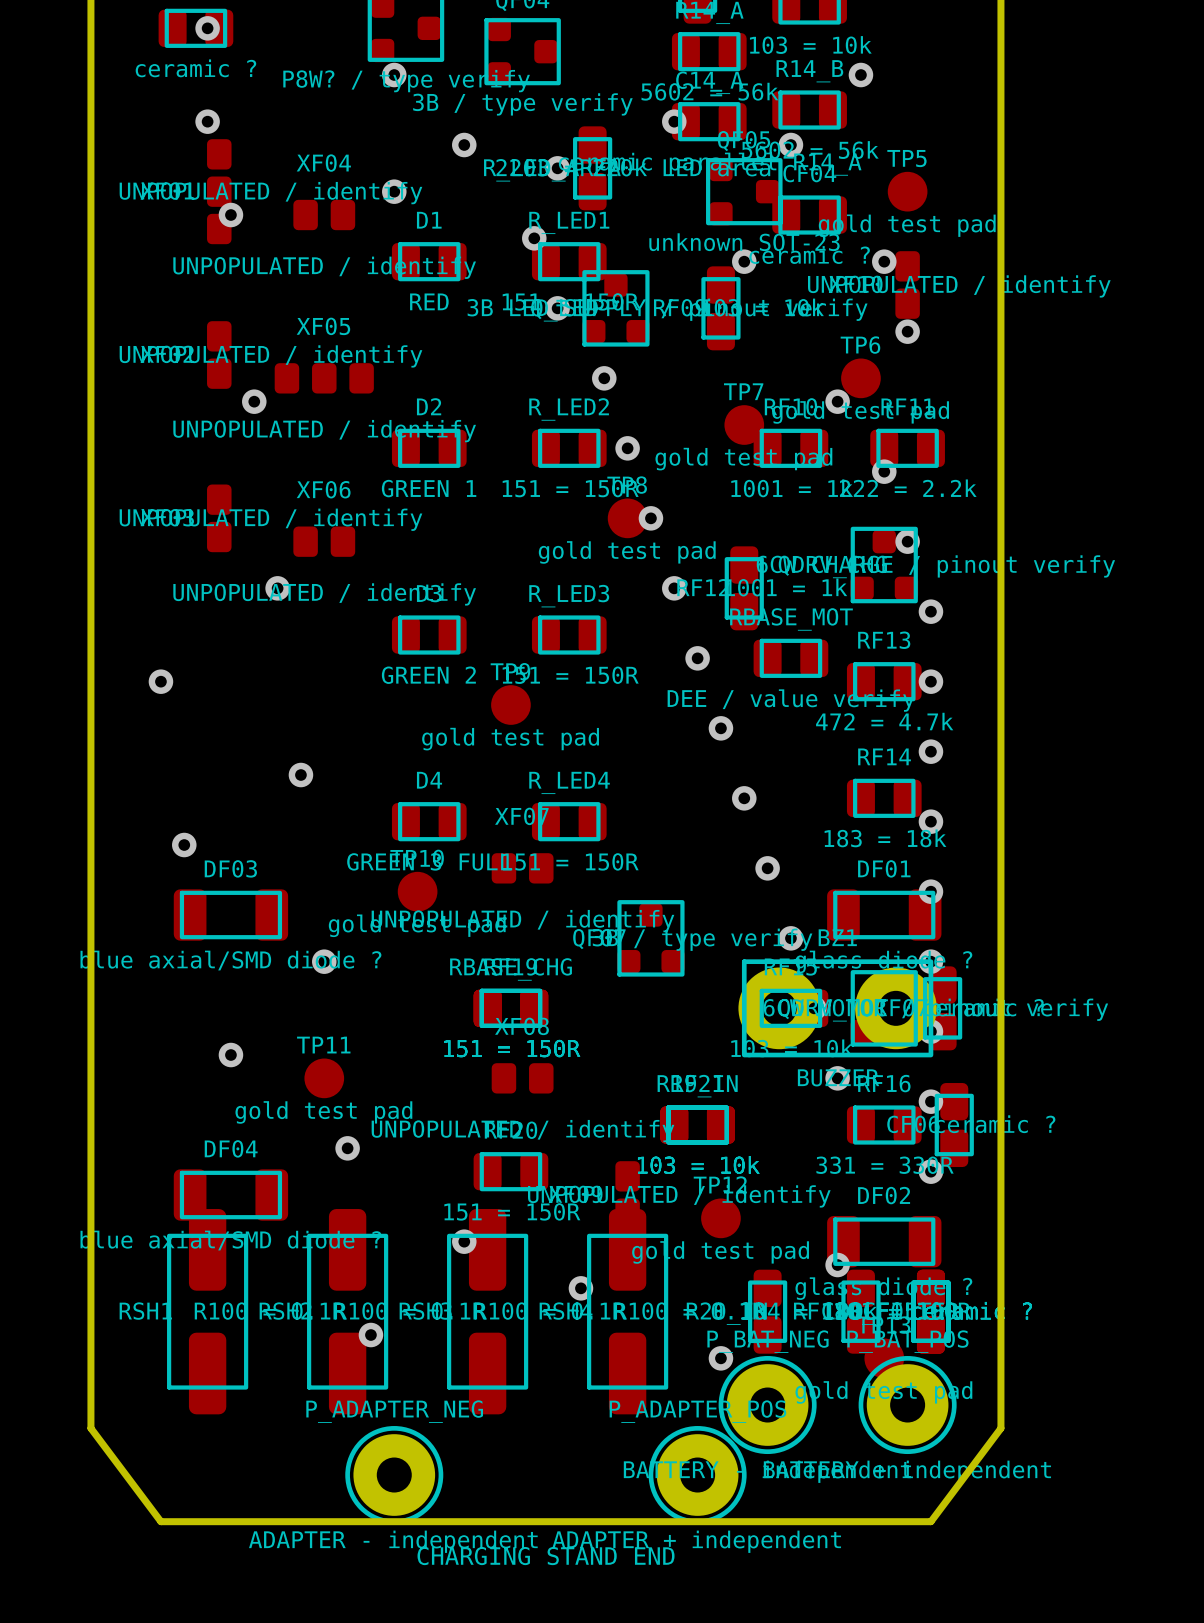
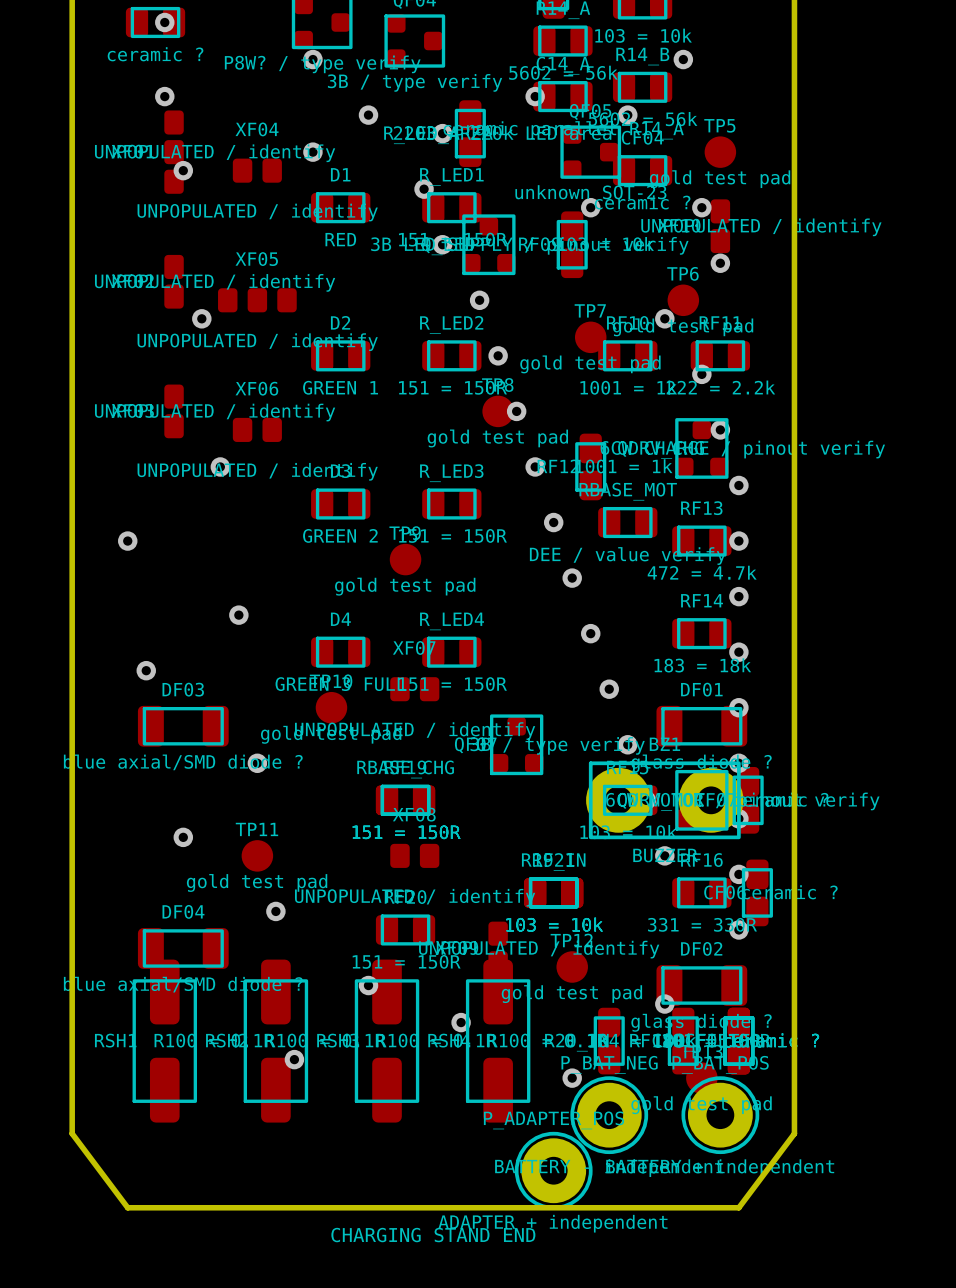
P_ADAPTER_NEG: ADAPTER - independent (394, 1475) -> none

